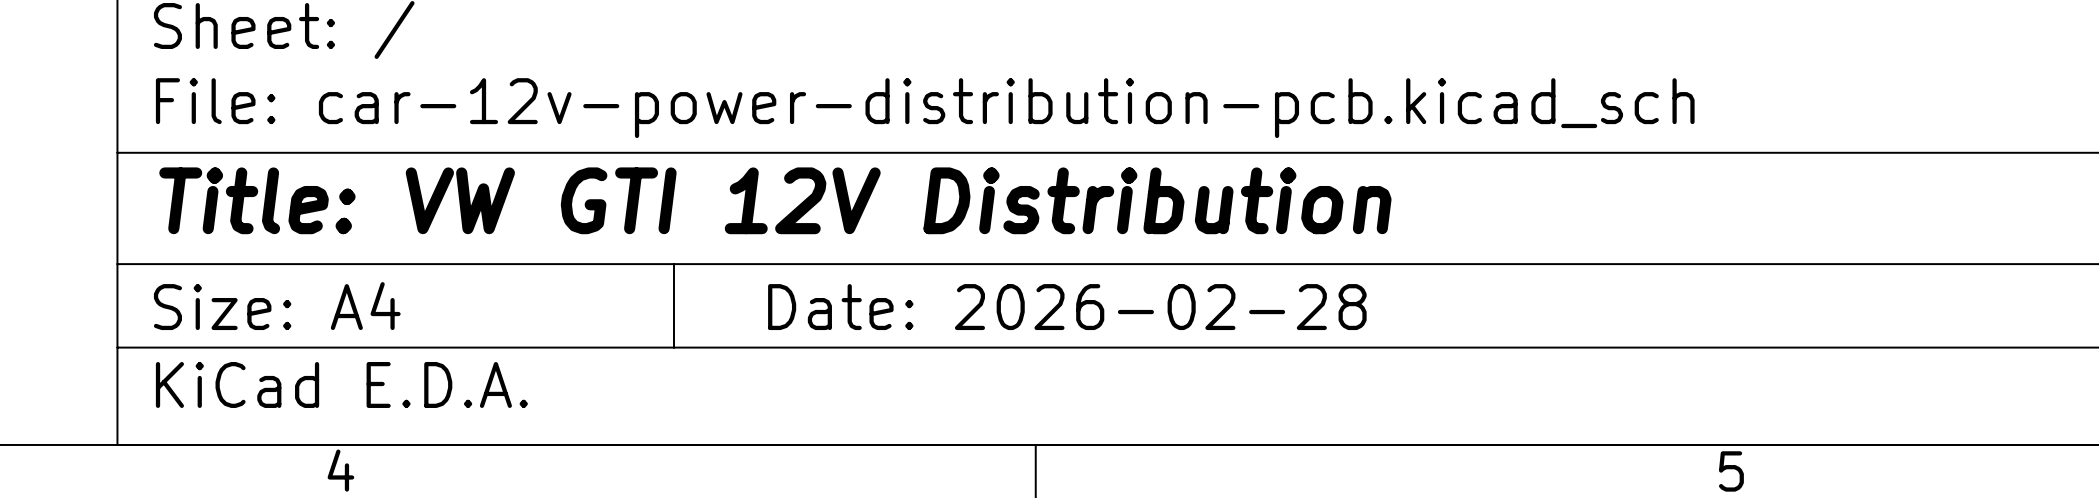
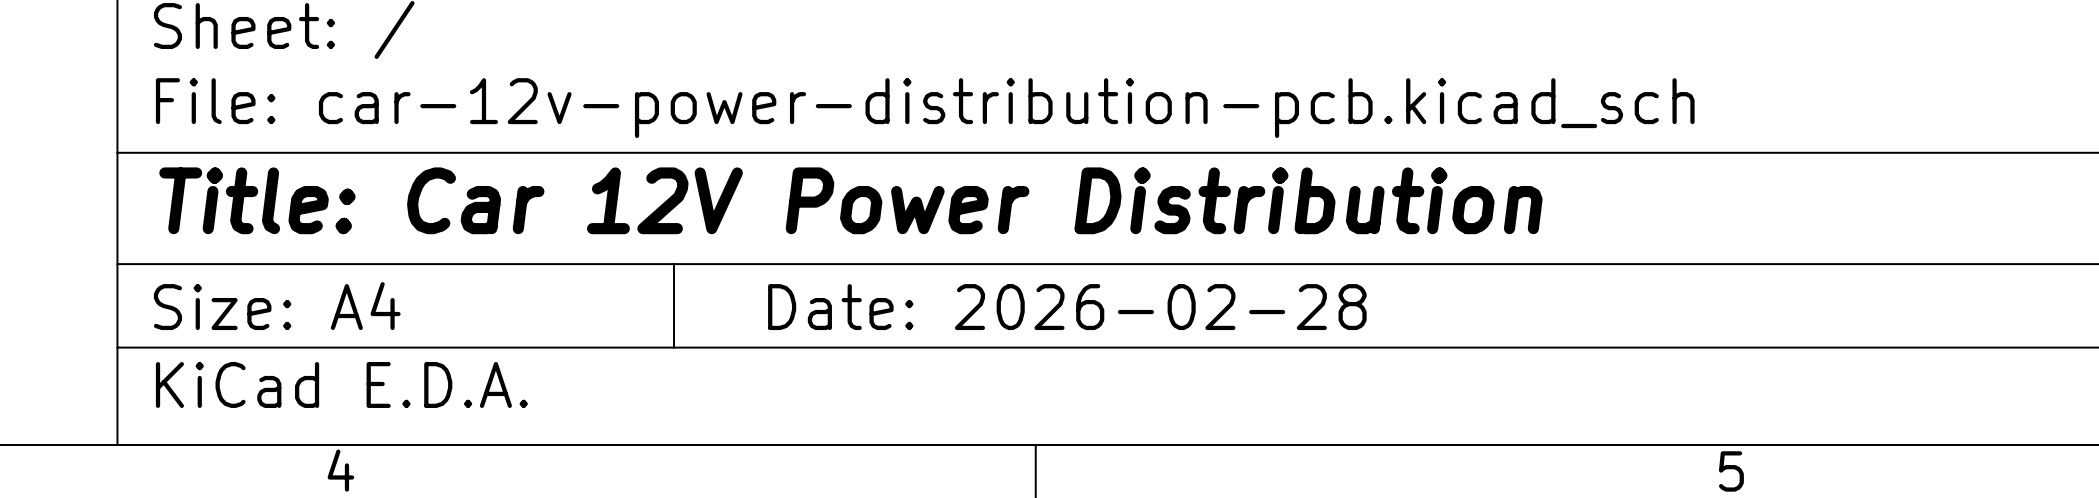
title block: Title: VW GTI 12V Distribution (775, 200) -> Title: Car 12V Power Distribution (850, 200)

